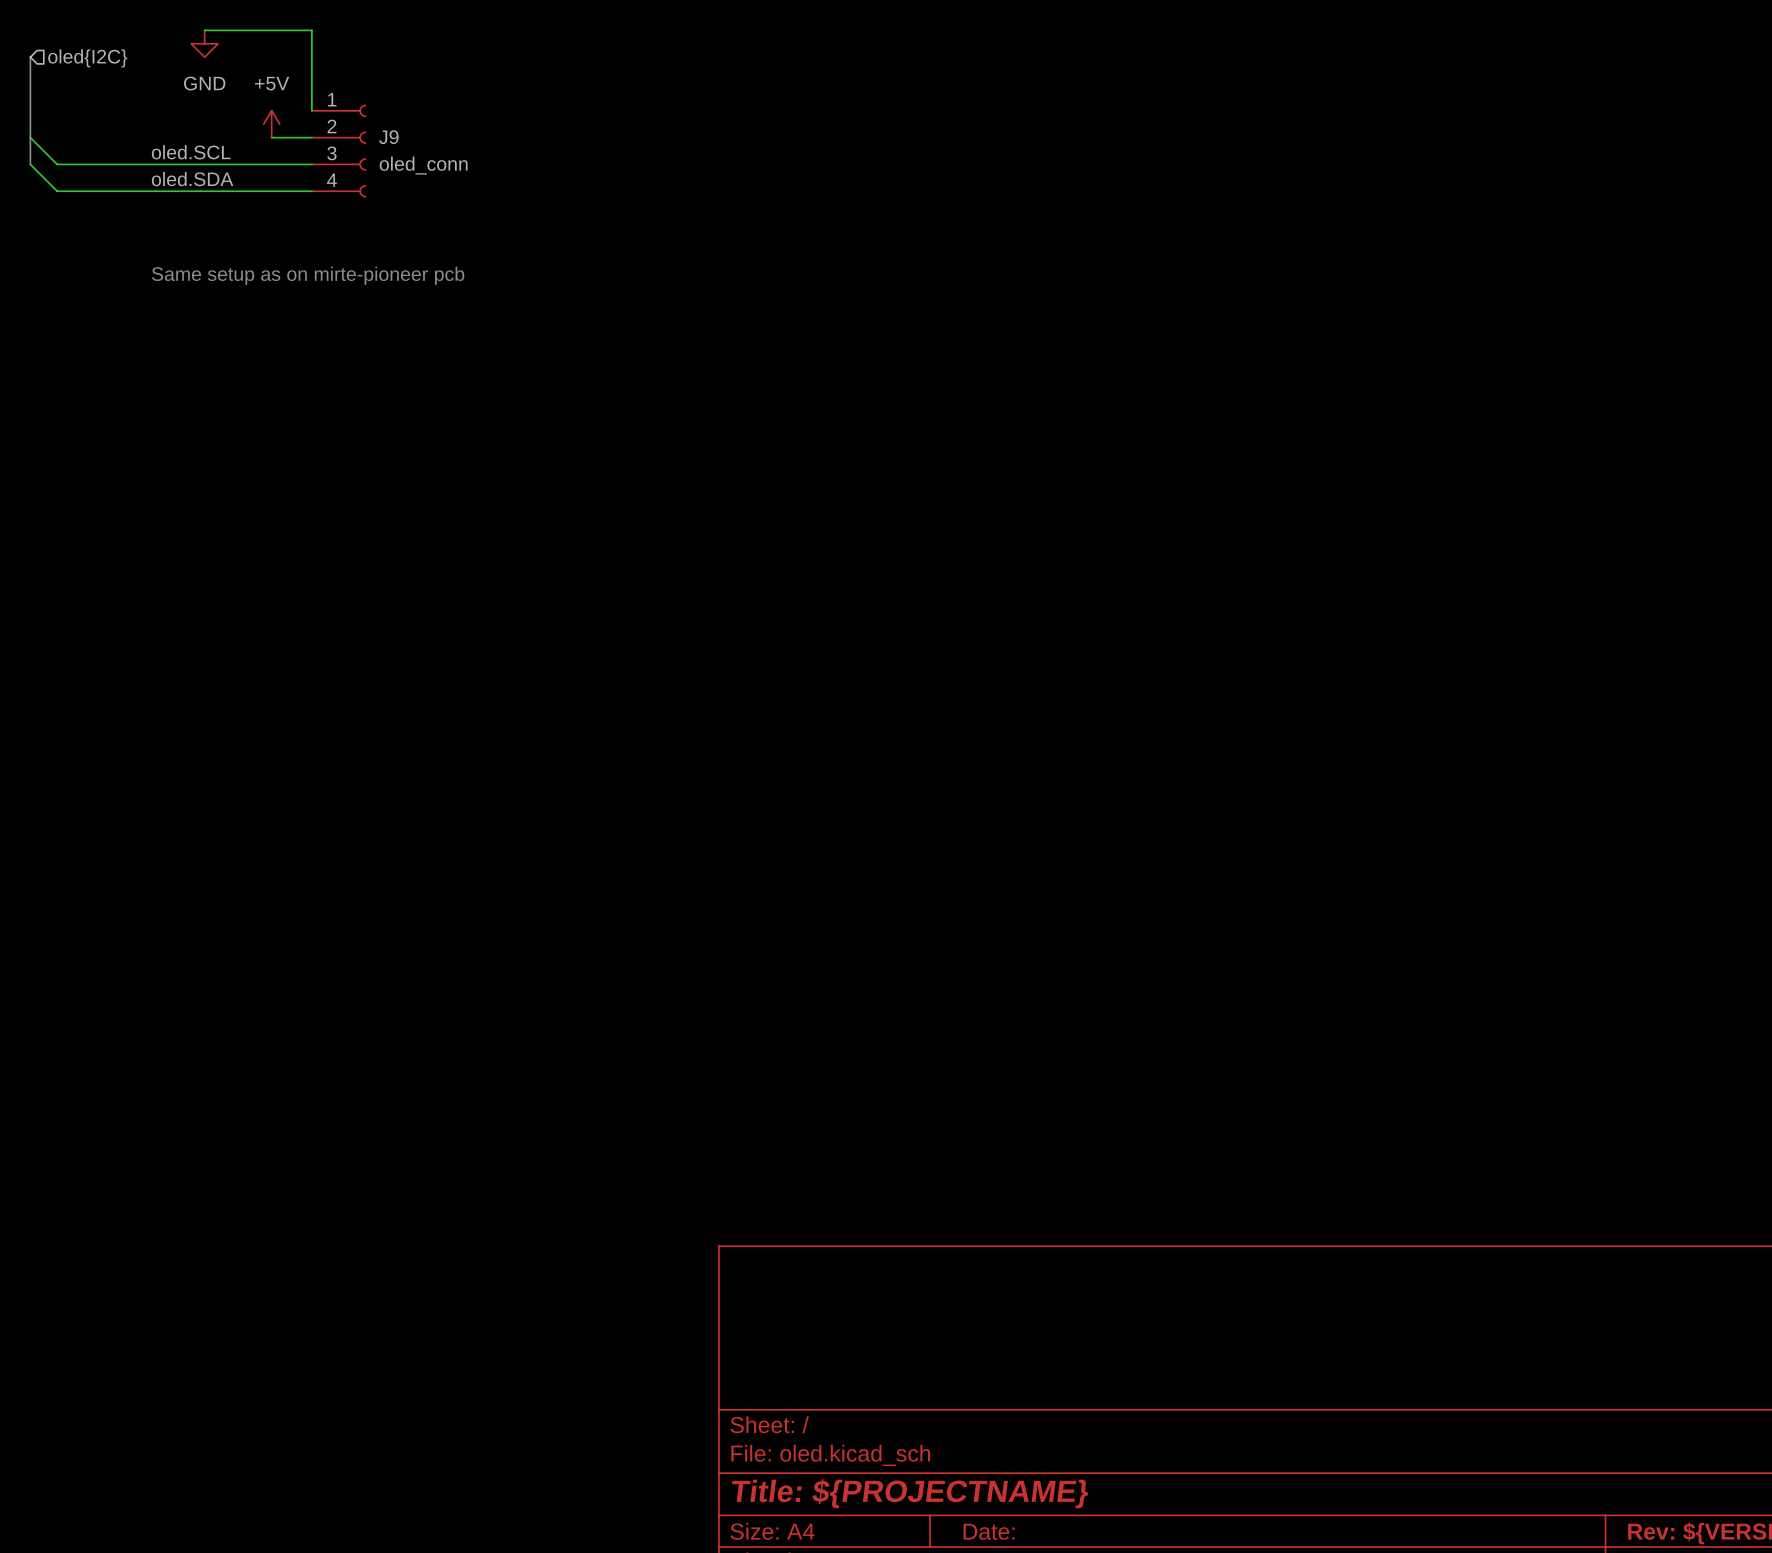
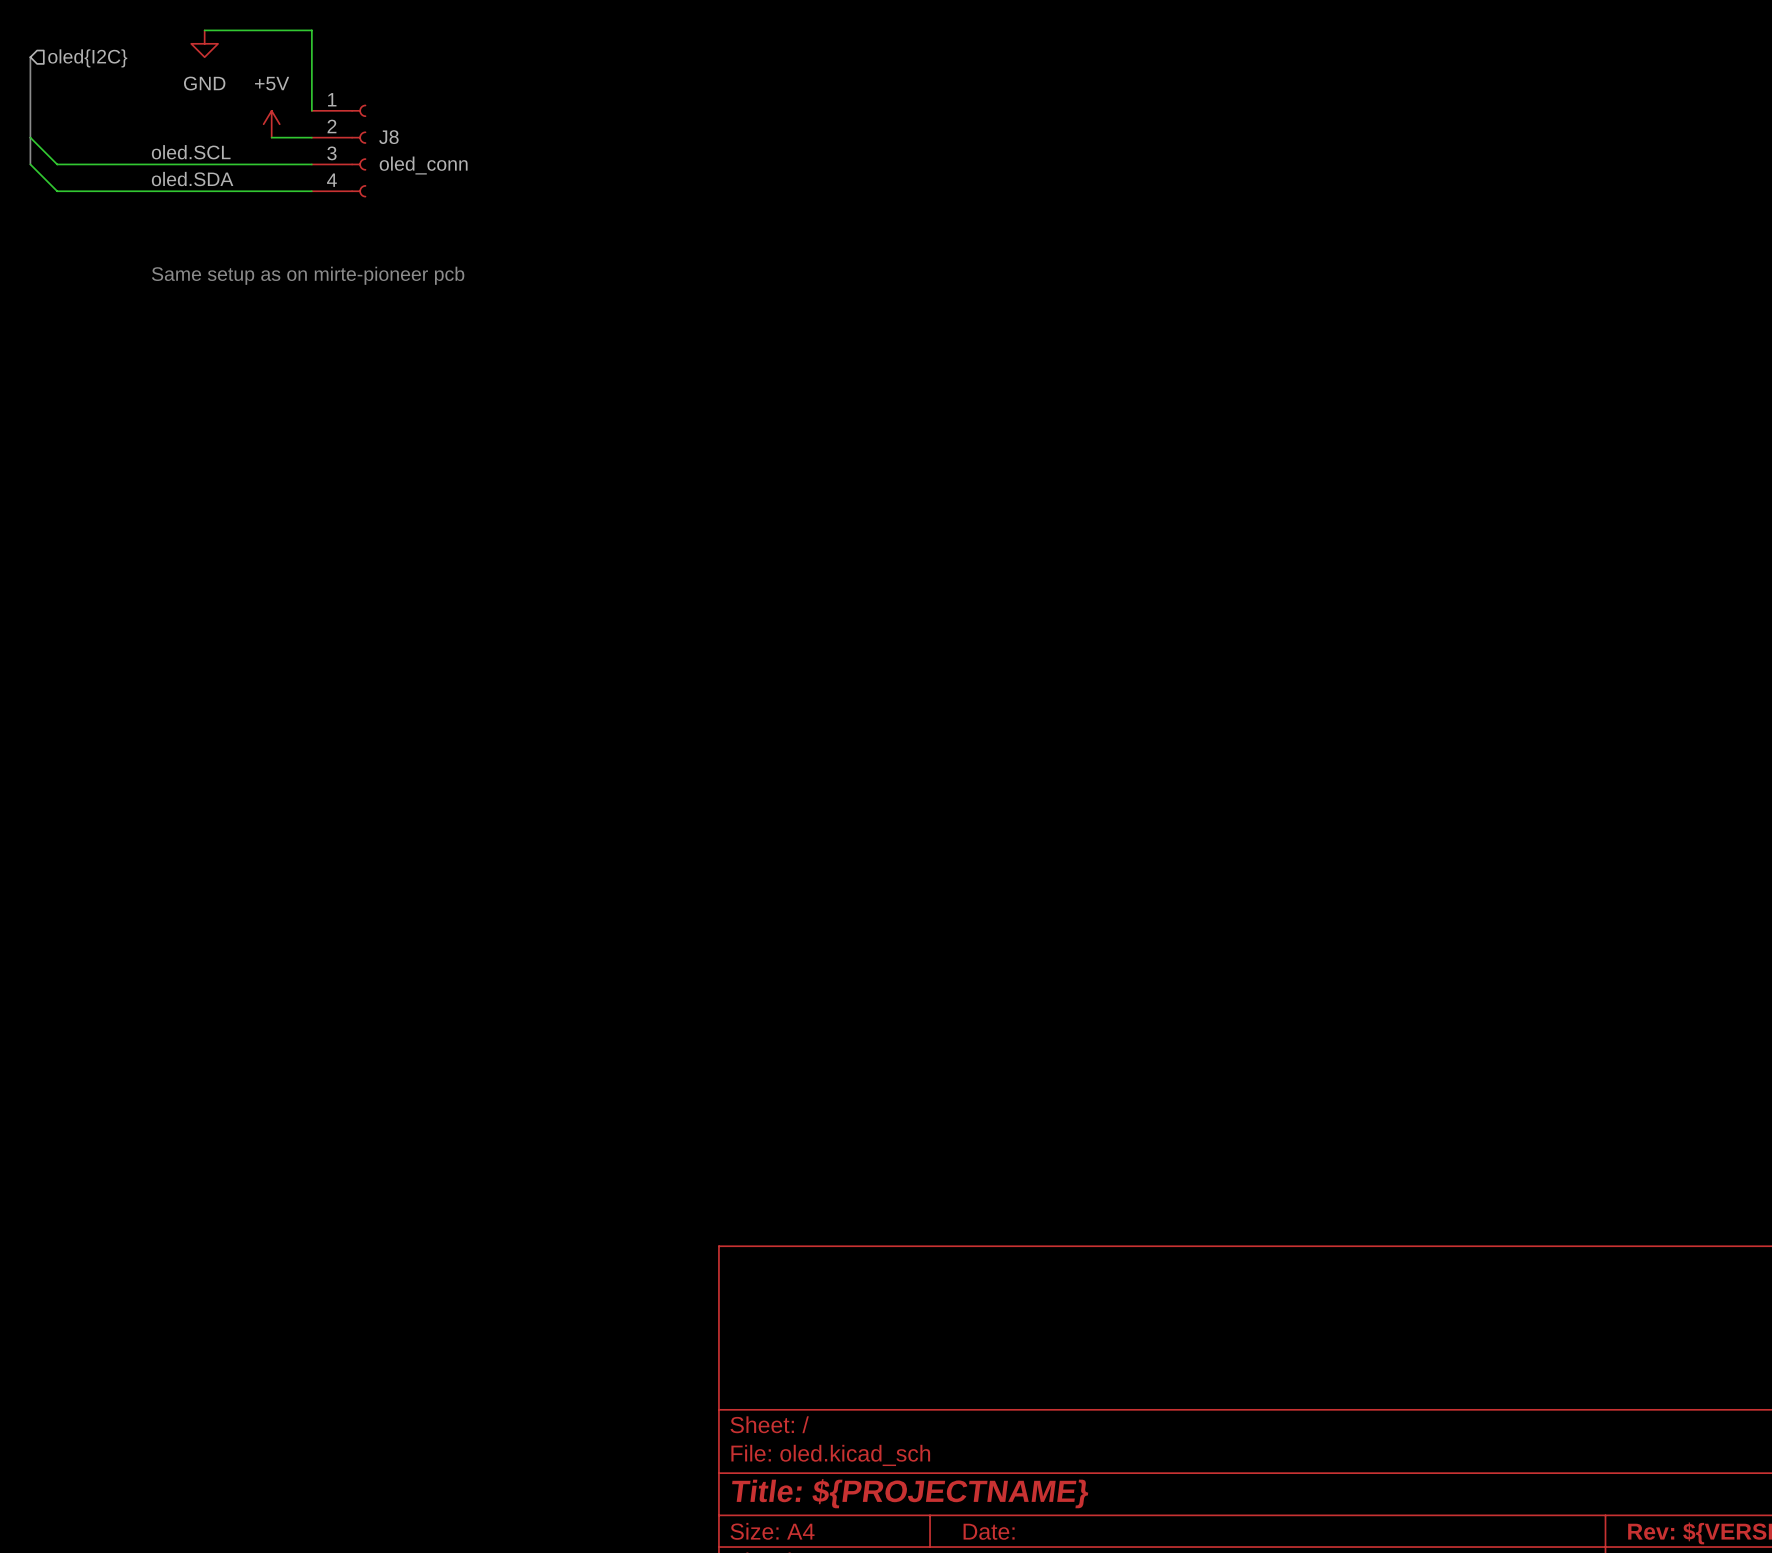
J9 name: J9 (388, 137) -> J8 (388, 137)

